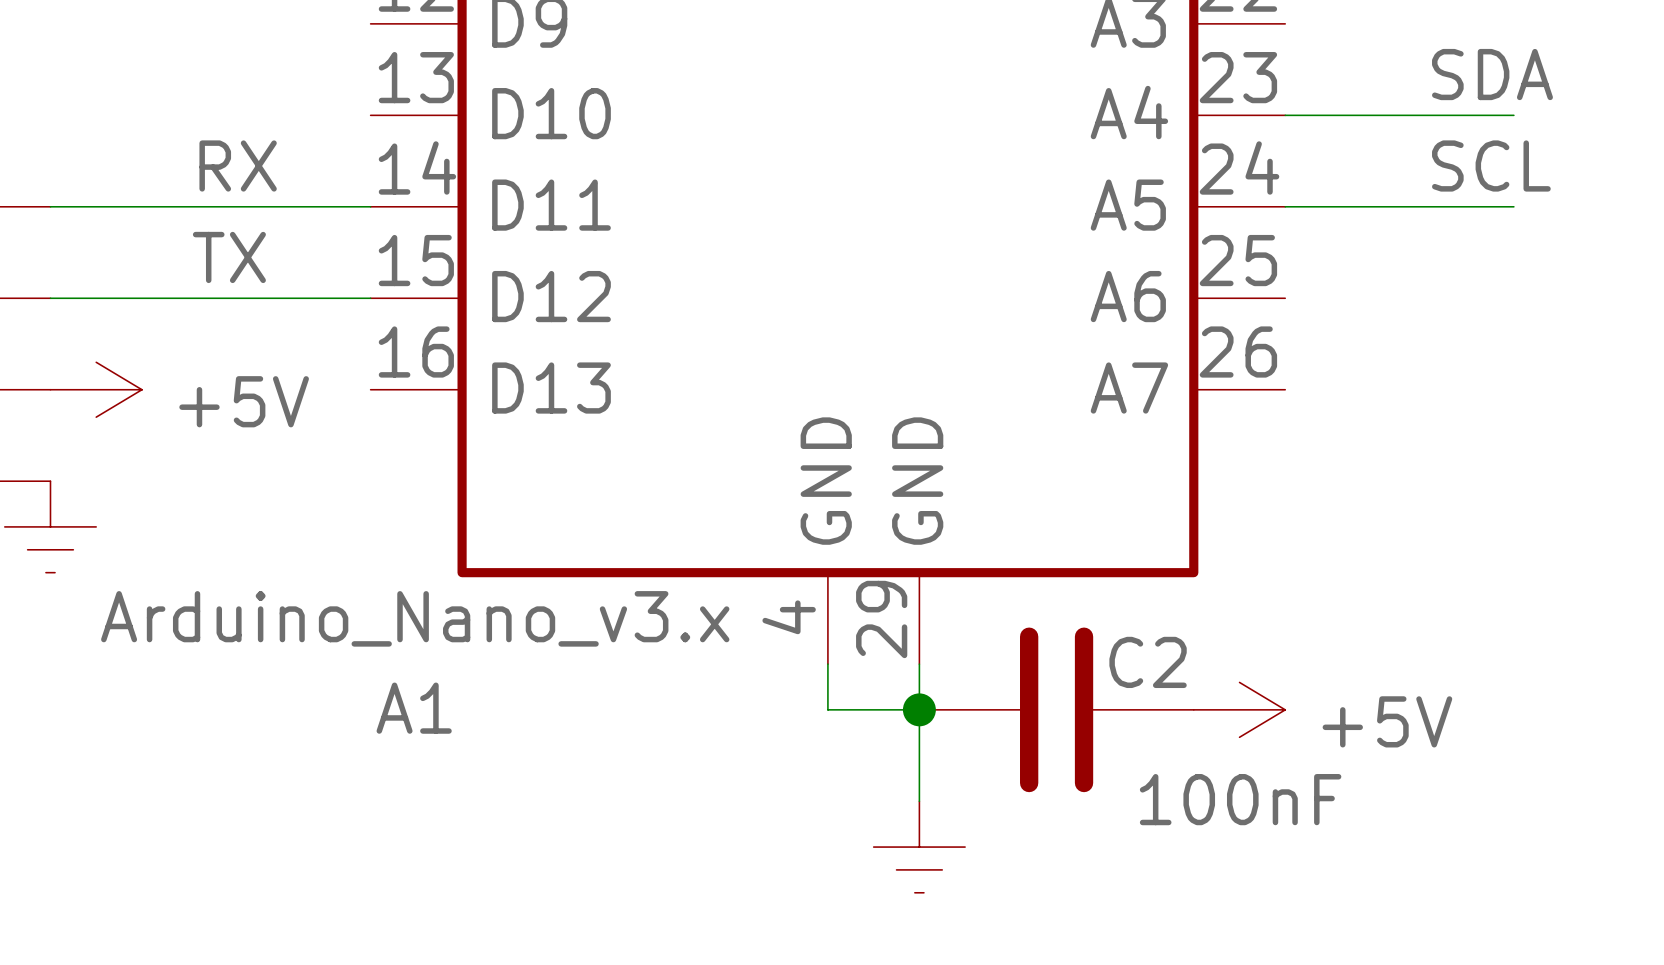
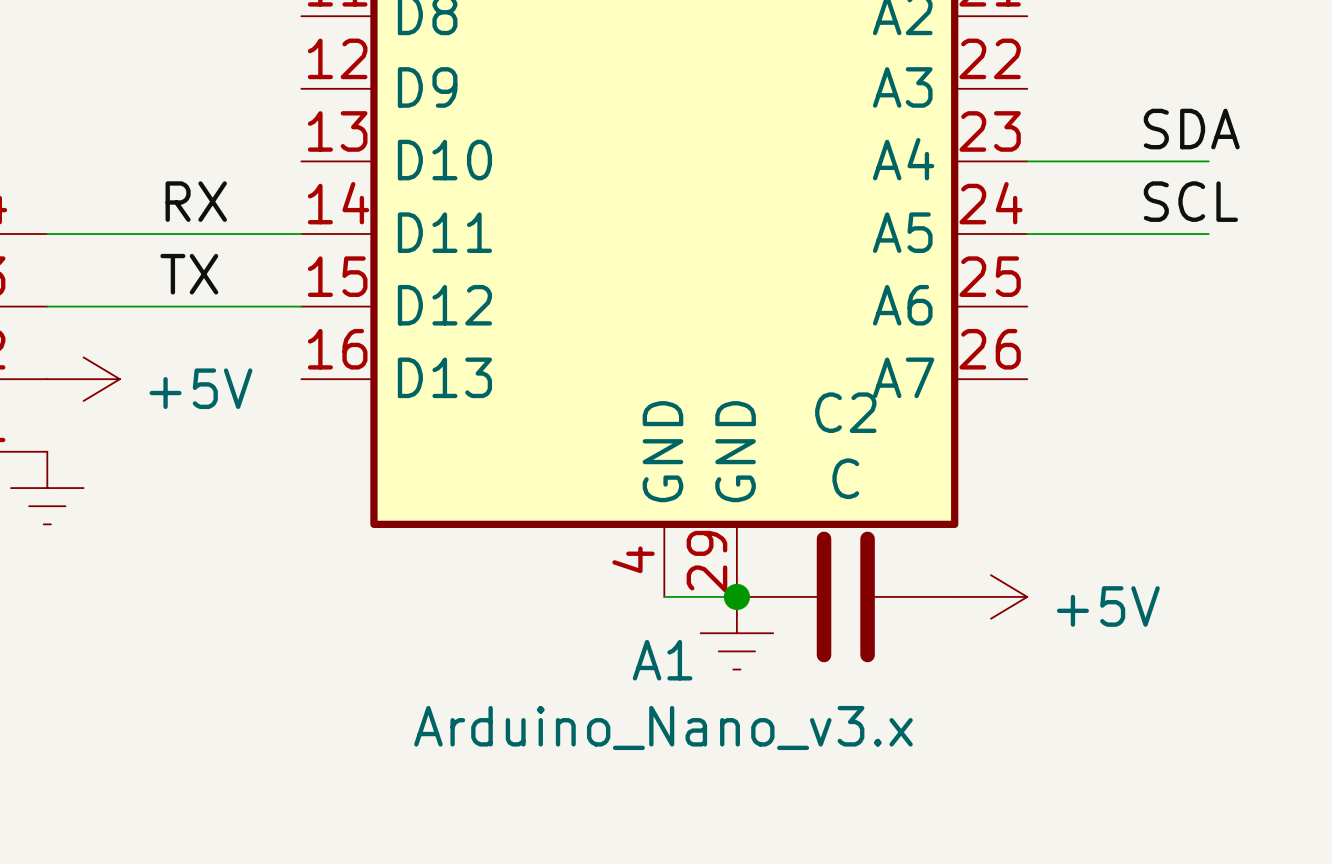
A1 value position: Arduino_Nano_v3.x (415, 618) -> Arduino_Nano_v3.x (663, 727)
C2 name position: C2 (1148, 662) -> C2 (845, 412)
wire: (827, 664) (827, 709) (919, 709) -> (664, 596) (736, 596)
wire: (919, 664) (919, 801) -> none
A1 name position: A1 (414, 708) -> A1 (662, 660)
junction position: (919, 709) -> (736, 596)
C2 position: (1056, 709) -> (845, 596)
power symbol position: +5V (1239, 709) -> +5V (990, 596)
C2 value: 100nF (1240, 799) -> C (845, 478)
power symbol position: (919, 847) -> (736, 633)

